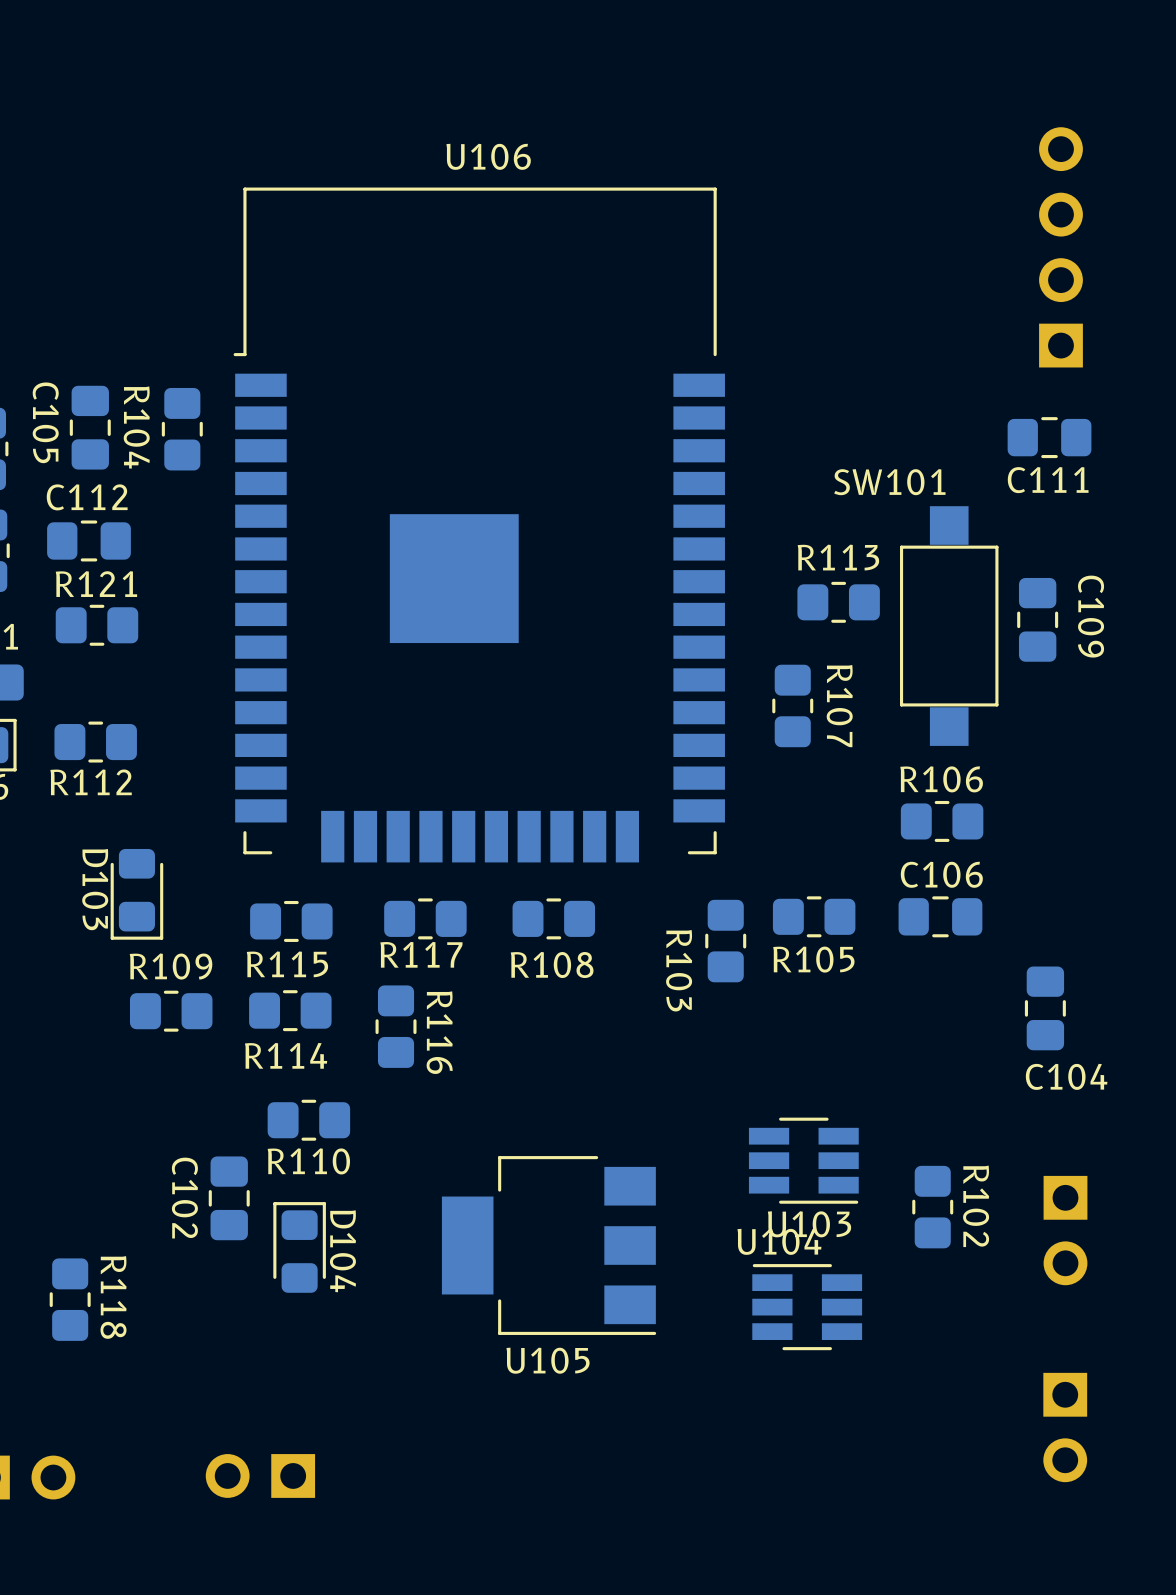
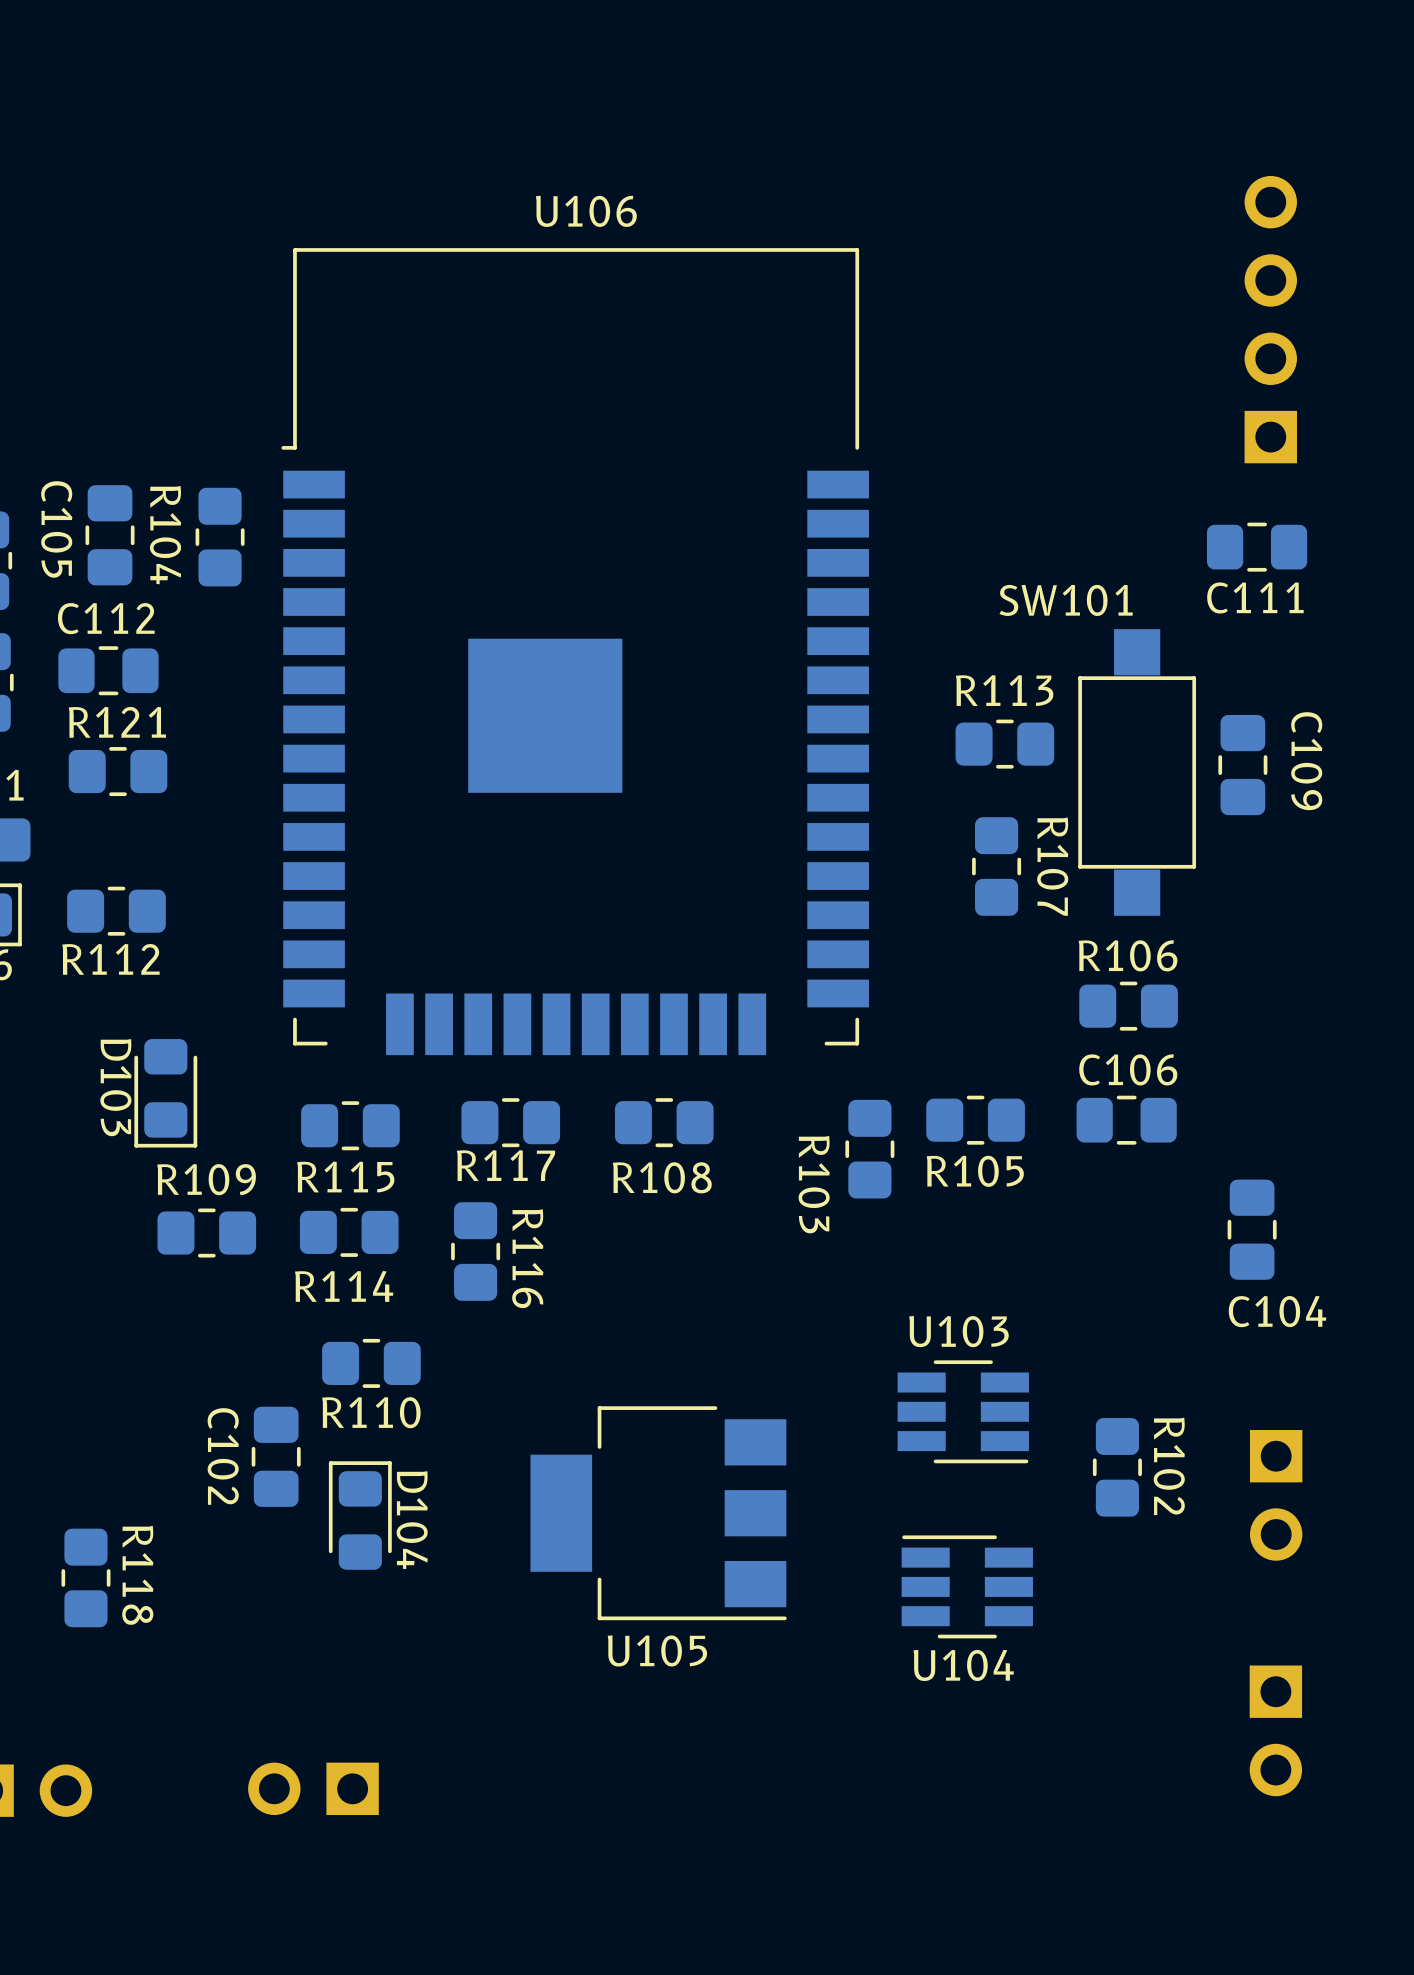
R107 position: (792, 705) -> (996, 866)
U103 name position: U103 (809, 1224) -> U103 (958, 1331)
U104 name position: U104 (779, 1241) -> U104 (963, 1665)

